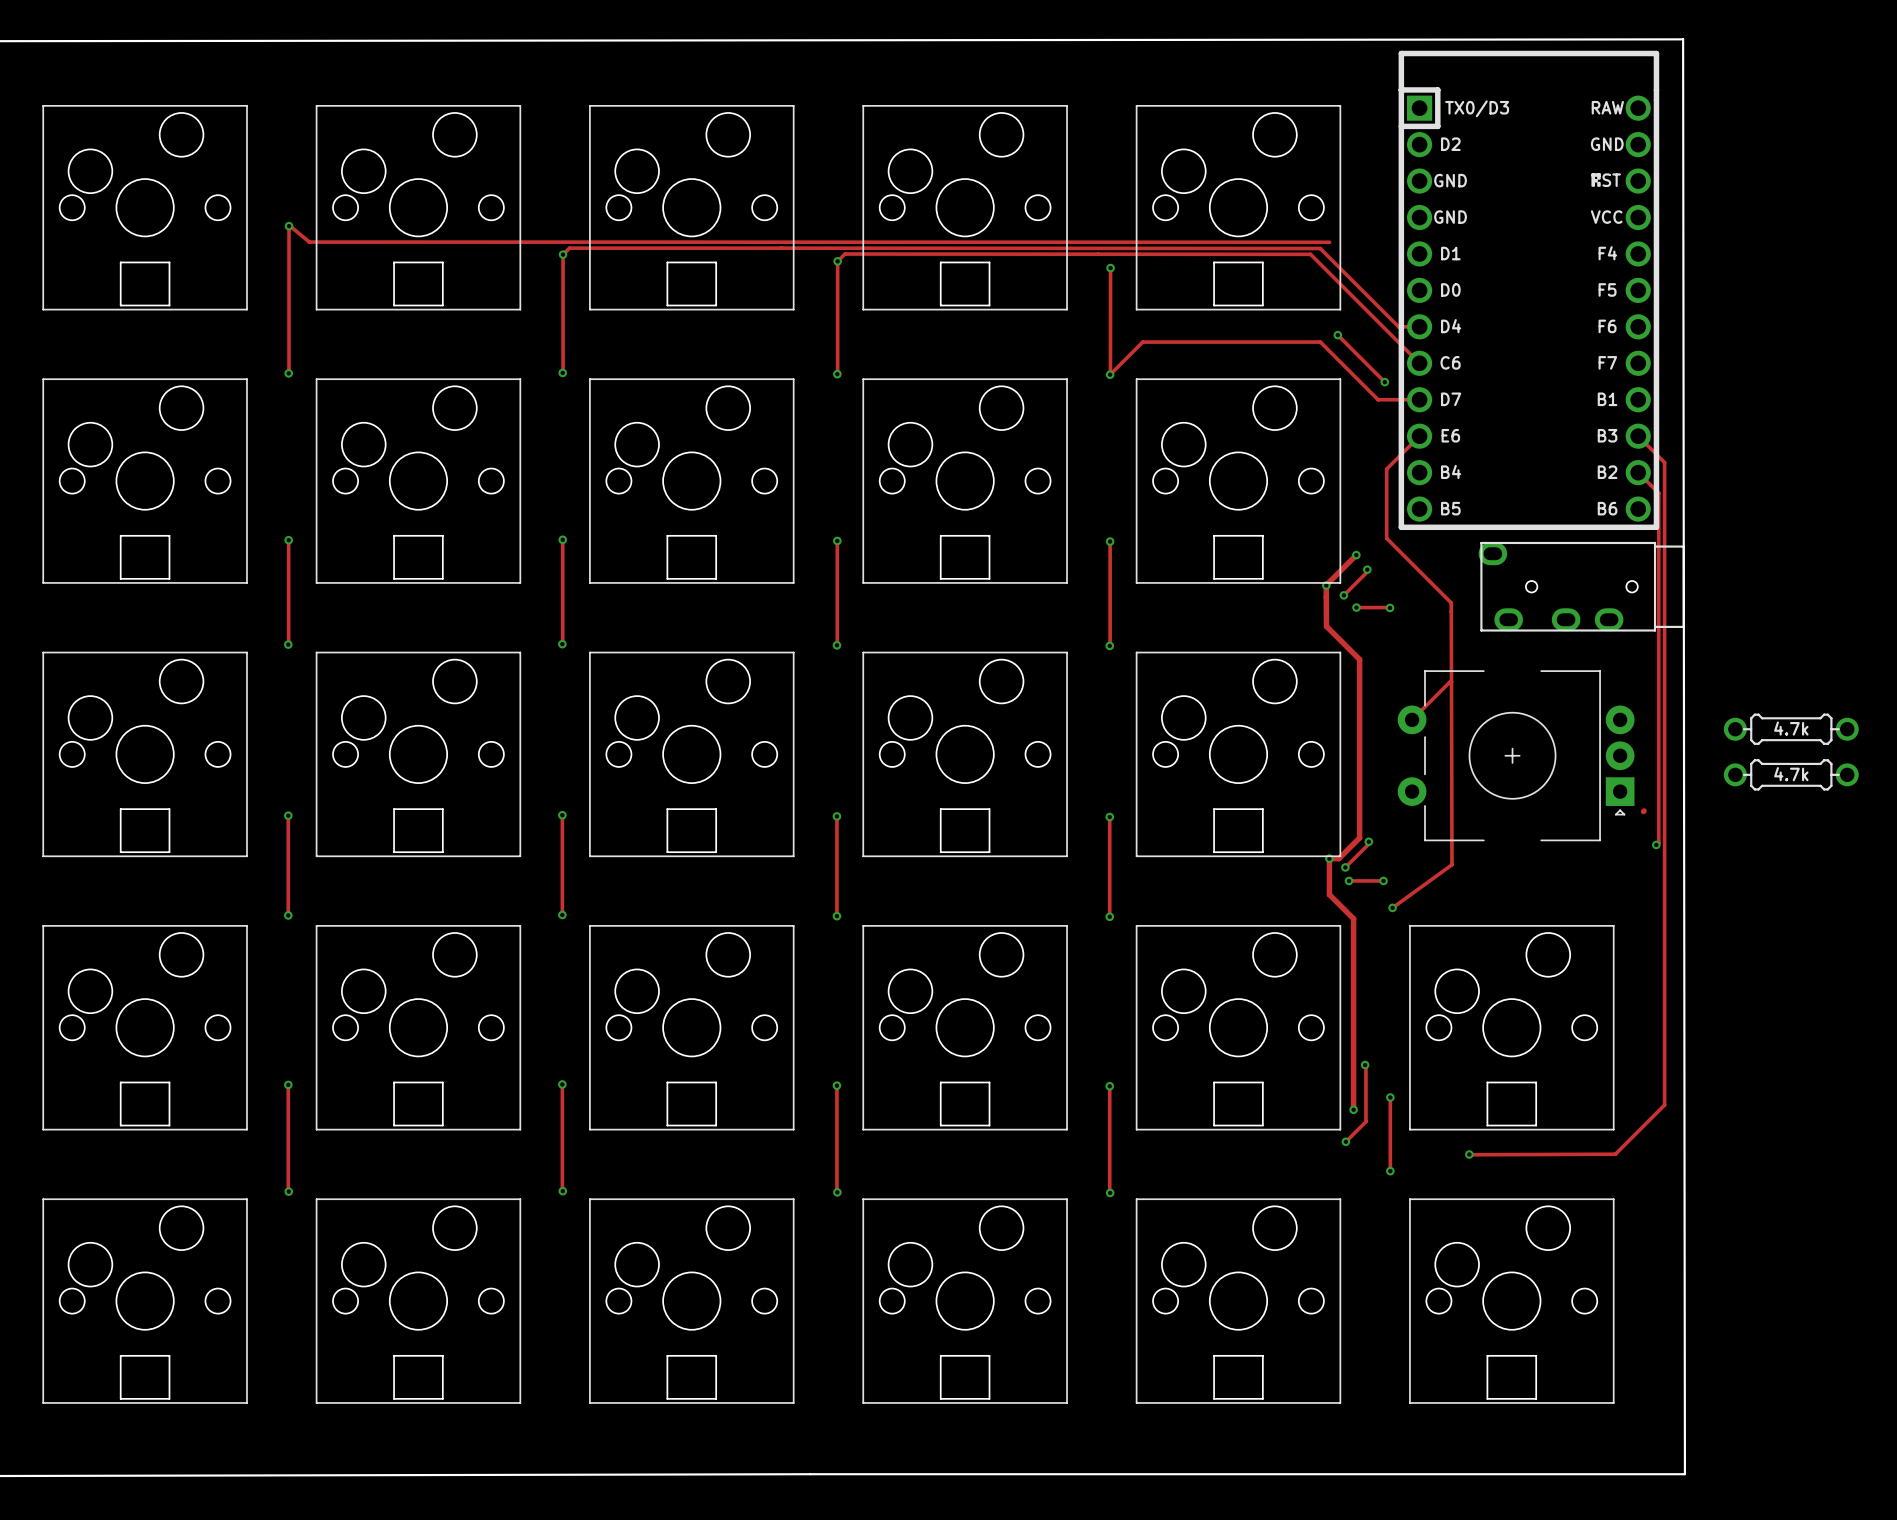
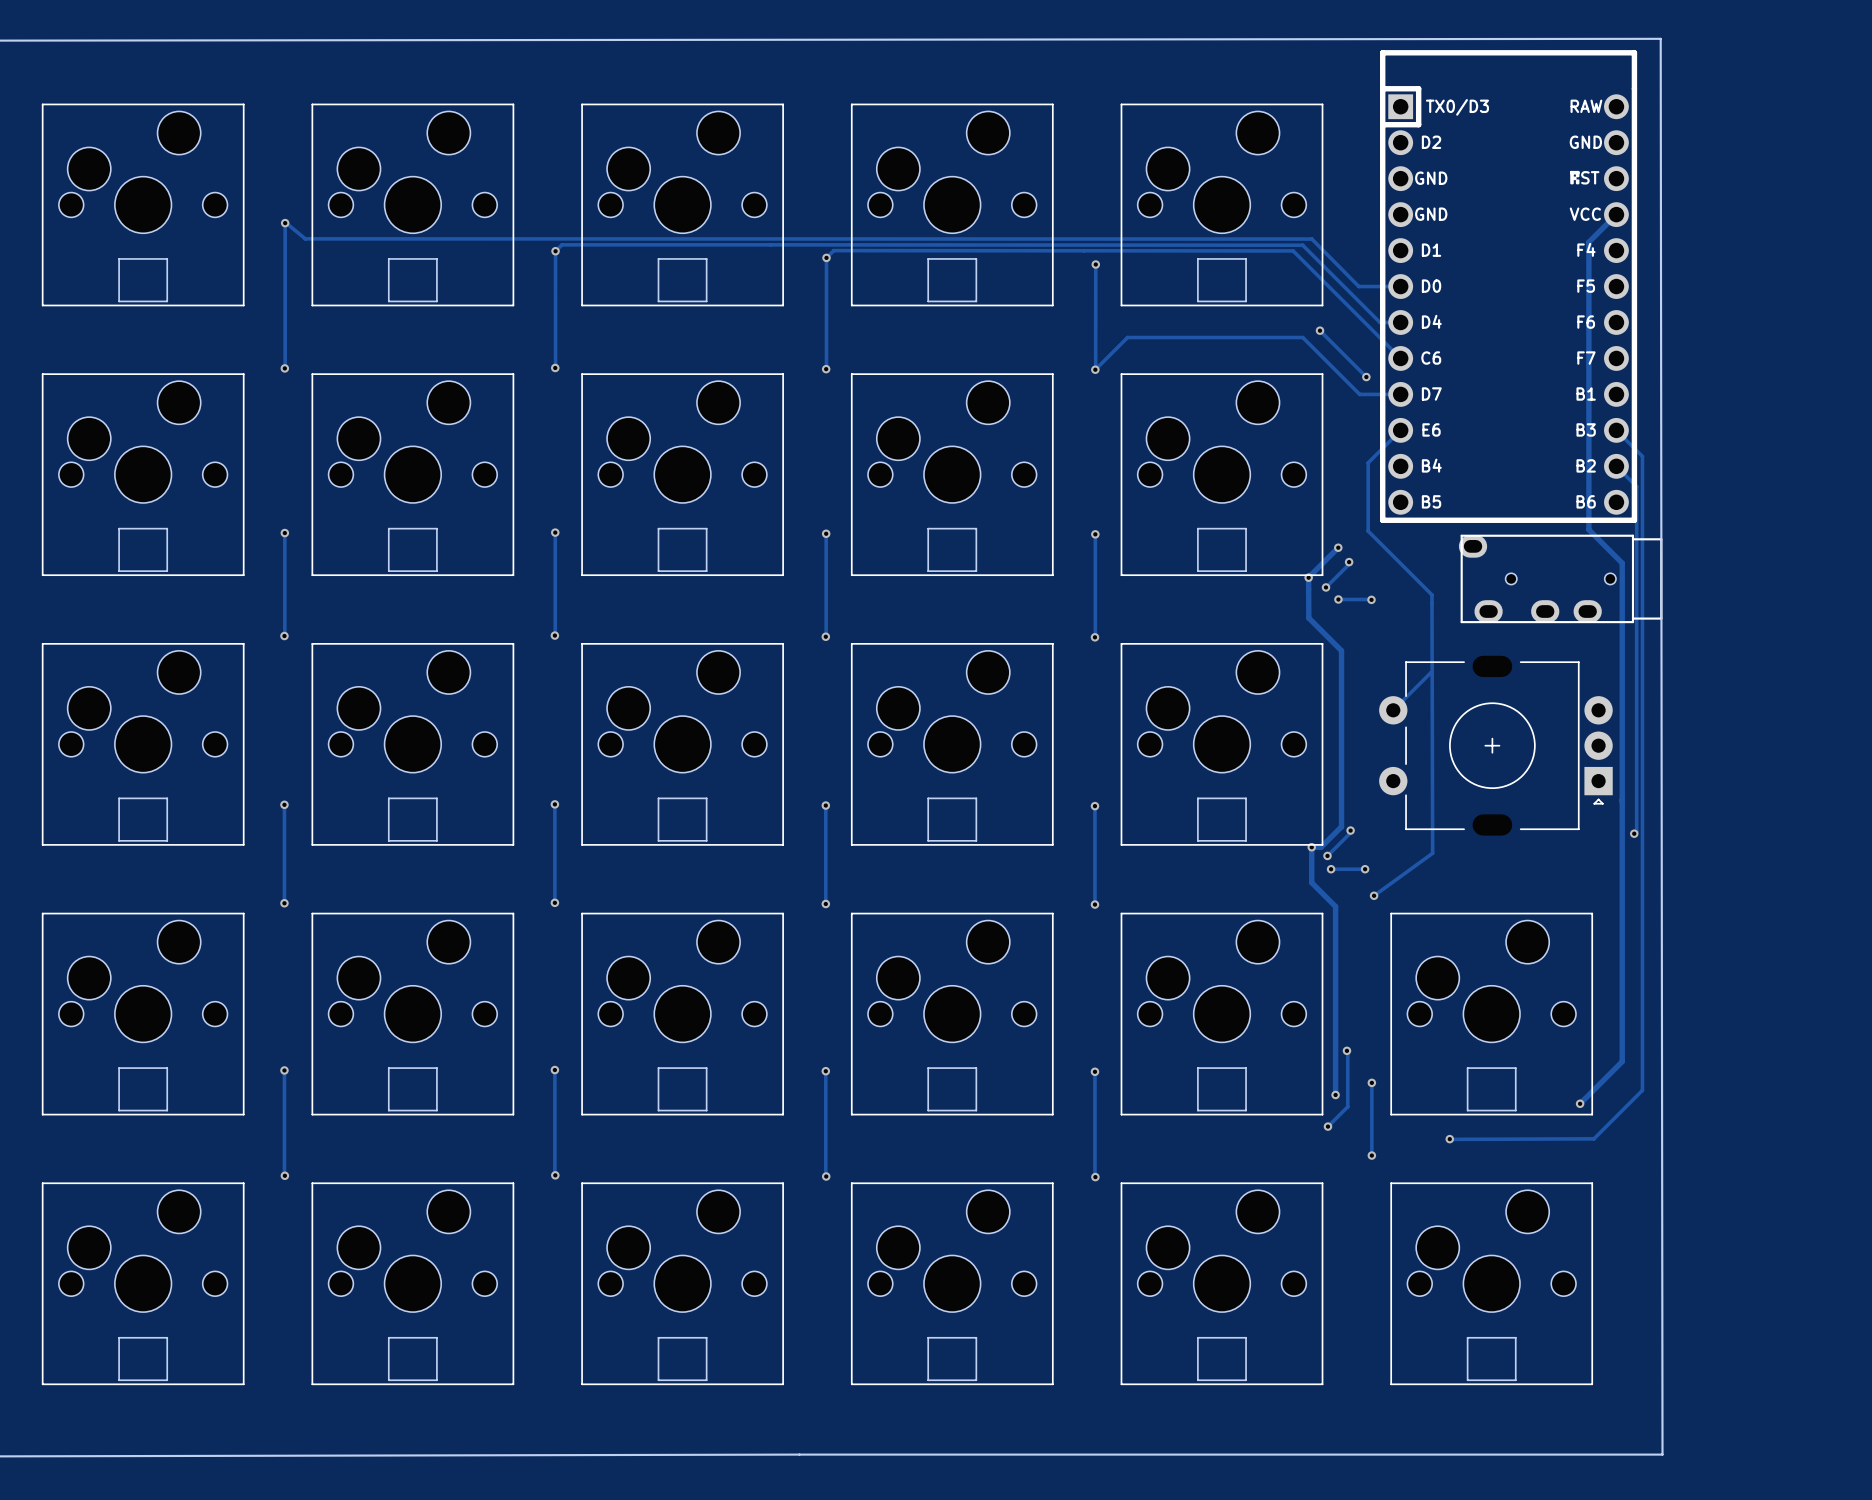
track: none -> (1616, 214) (1588, 242) (1588, 529) (1622, 563) (1622, 1061) (1580, 1103)
track: none -> (1311, 239) (1358, 286) (1400, 286)
part: 4.7k (1791, 729) -> none
part: 4.7k (1791, 774) -> none
via: none -> (1580, 1103)

